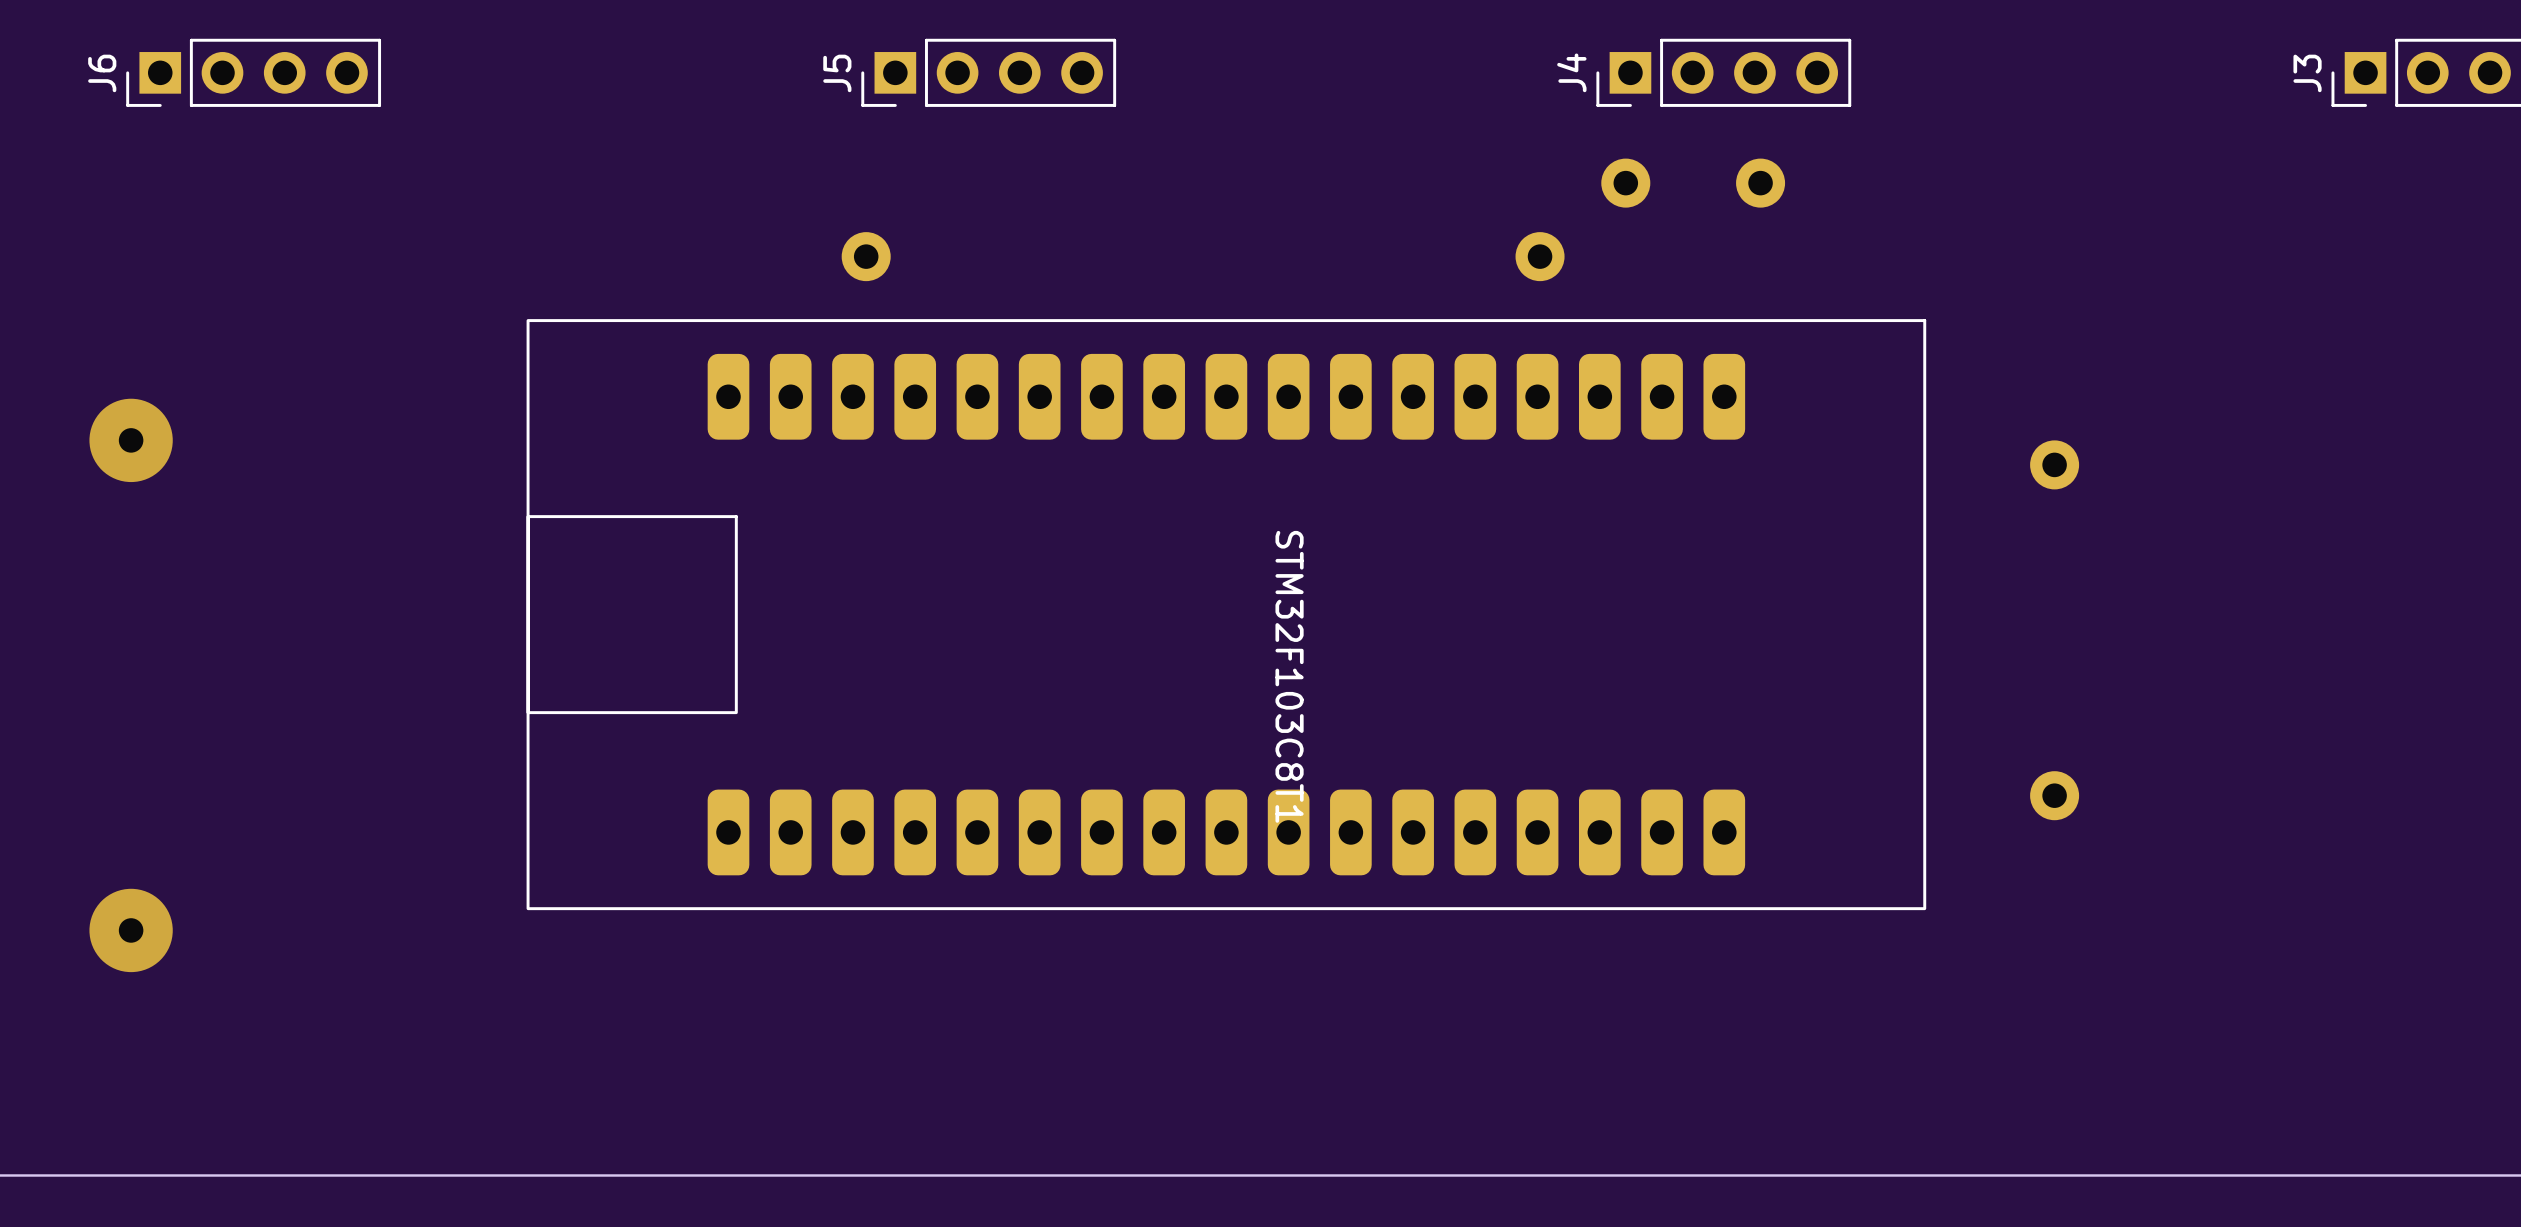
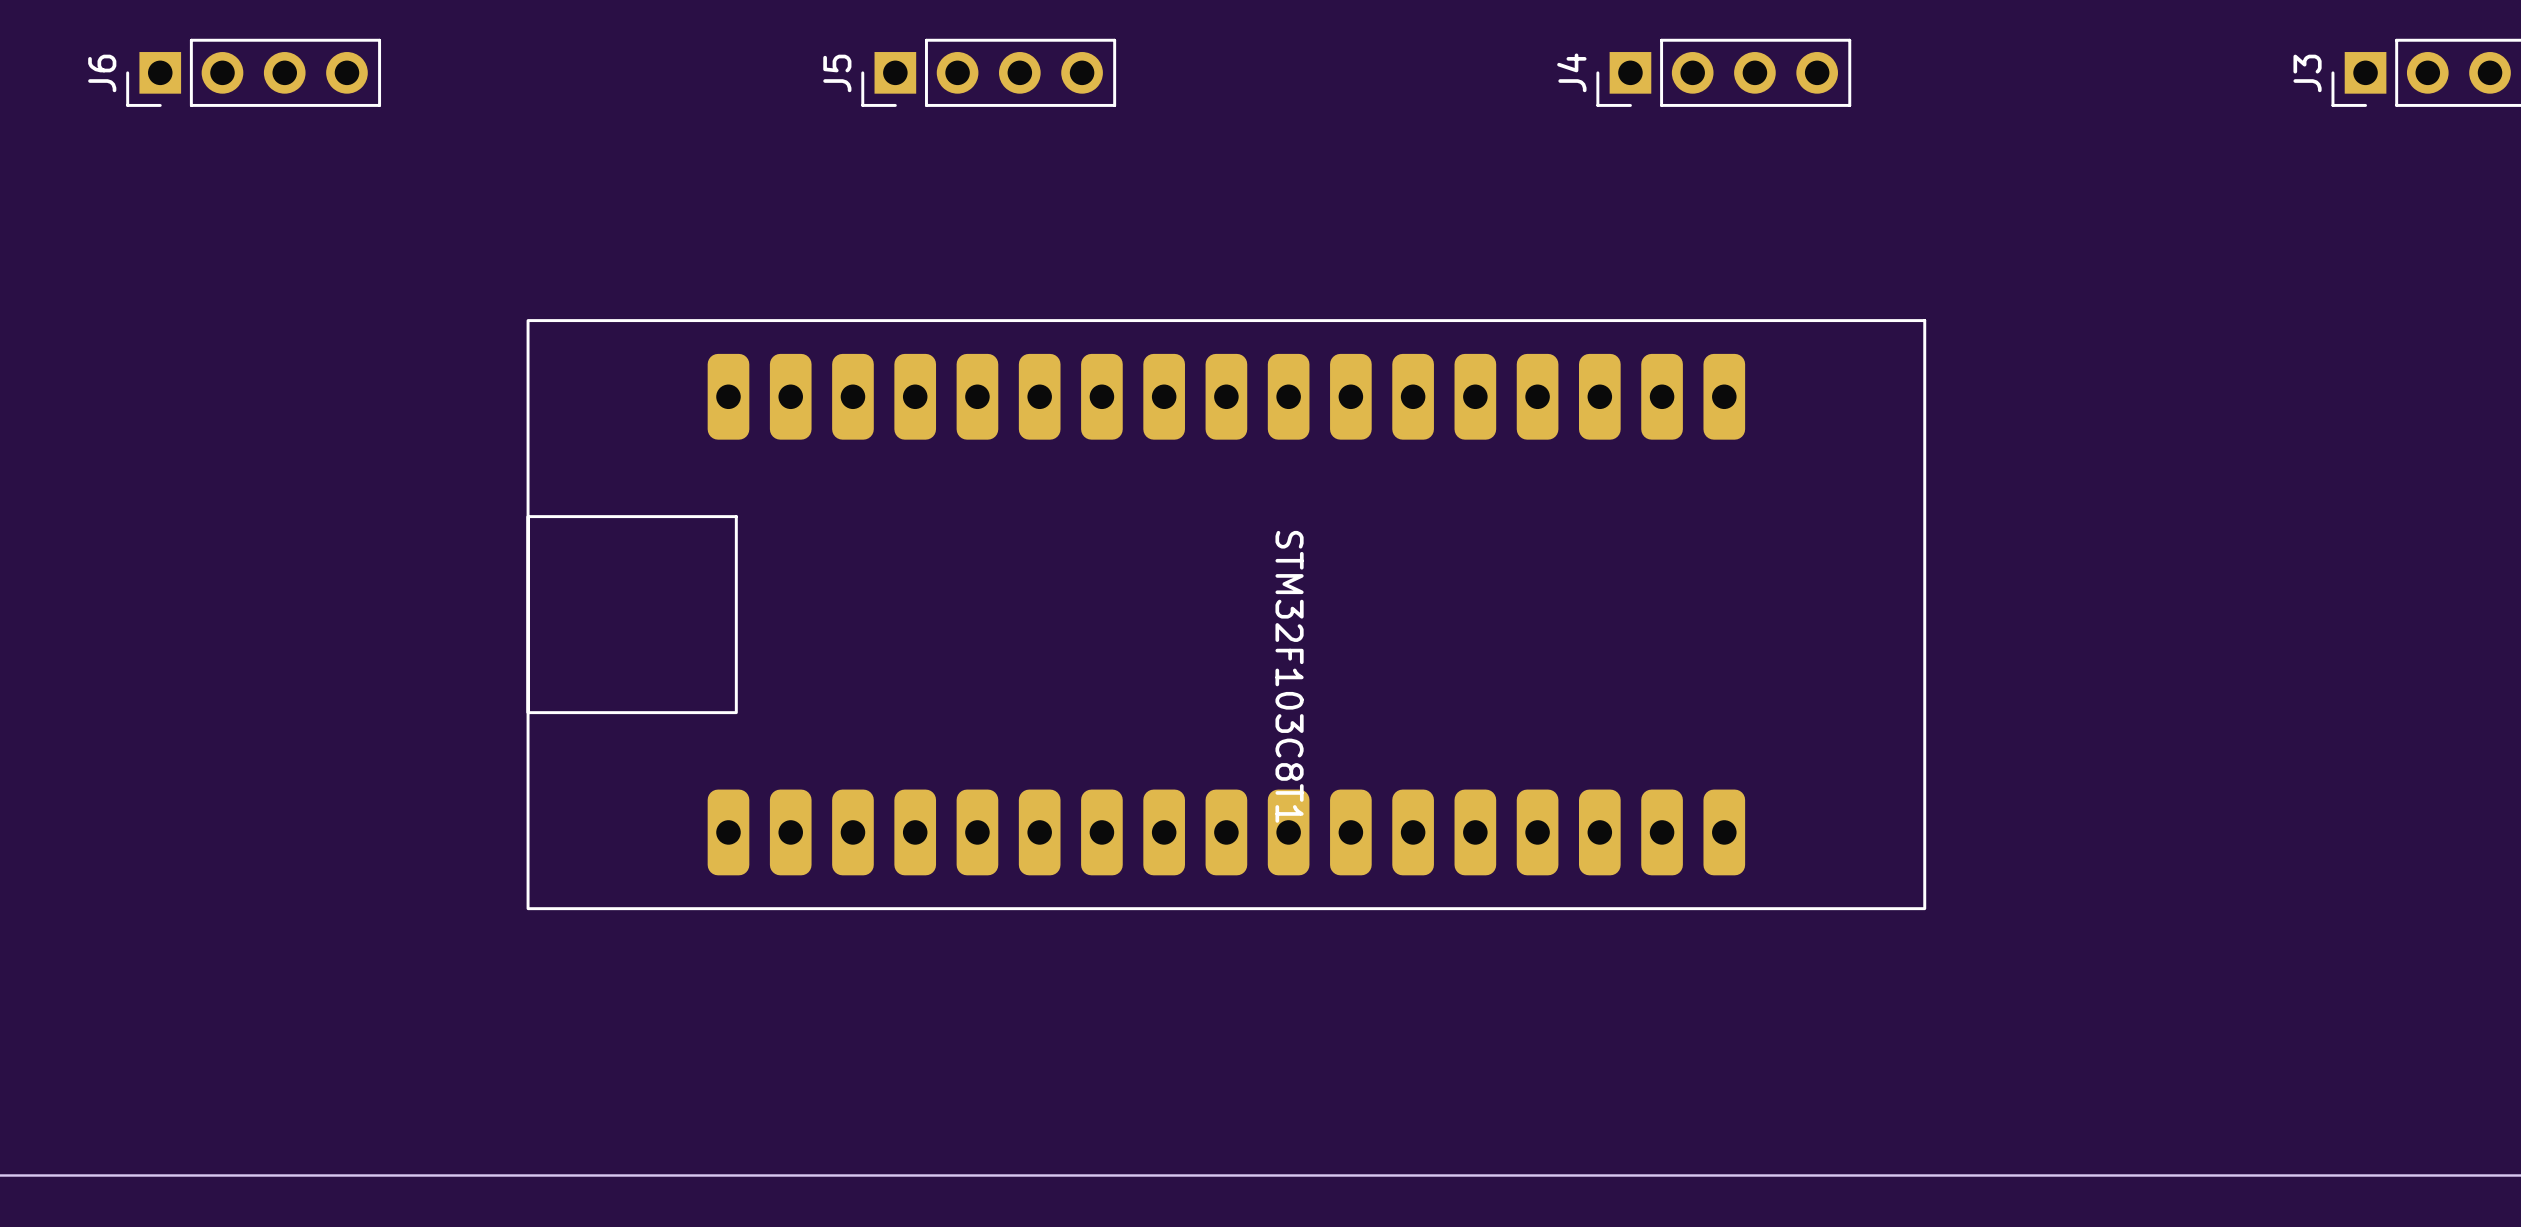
part: (1625, 183) -> none
part: (1760, 183) -> none
part: (866, 256) -> none
part: (1540, 256) -> none
via: (131, 440) -> none
part: (2054, 464) -> none
part: (2054, 795) -> none
via: (131, 930) -> none

